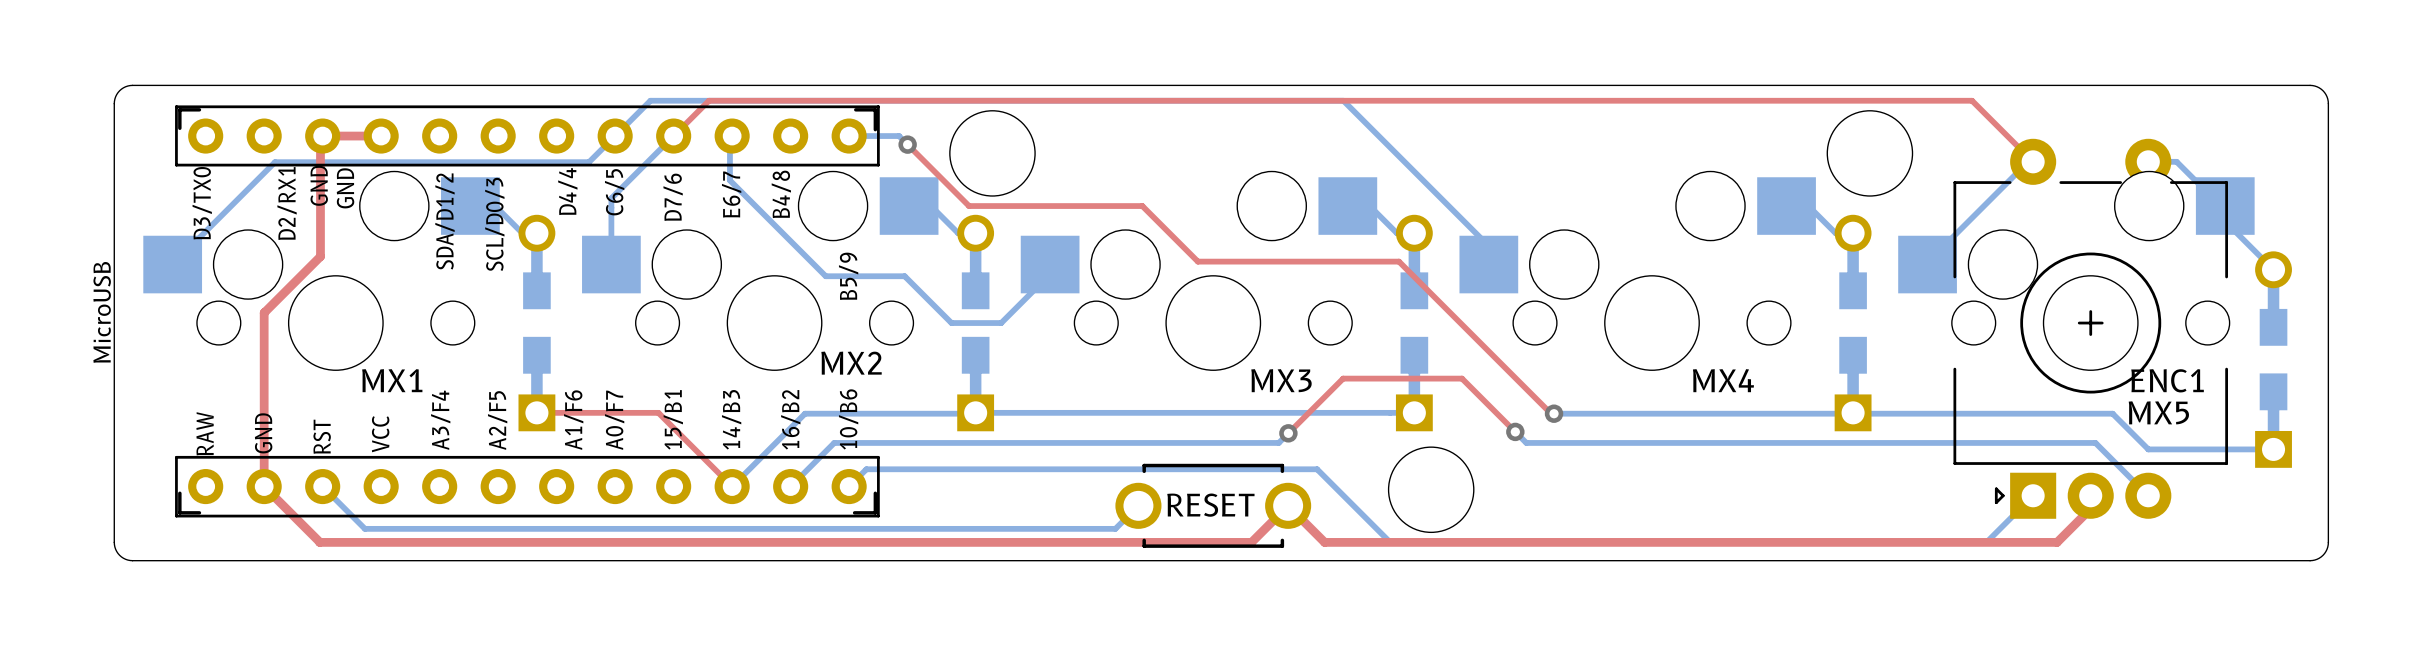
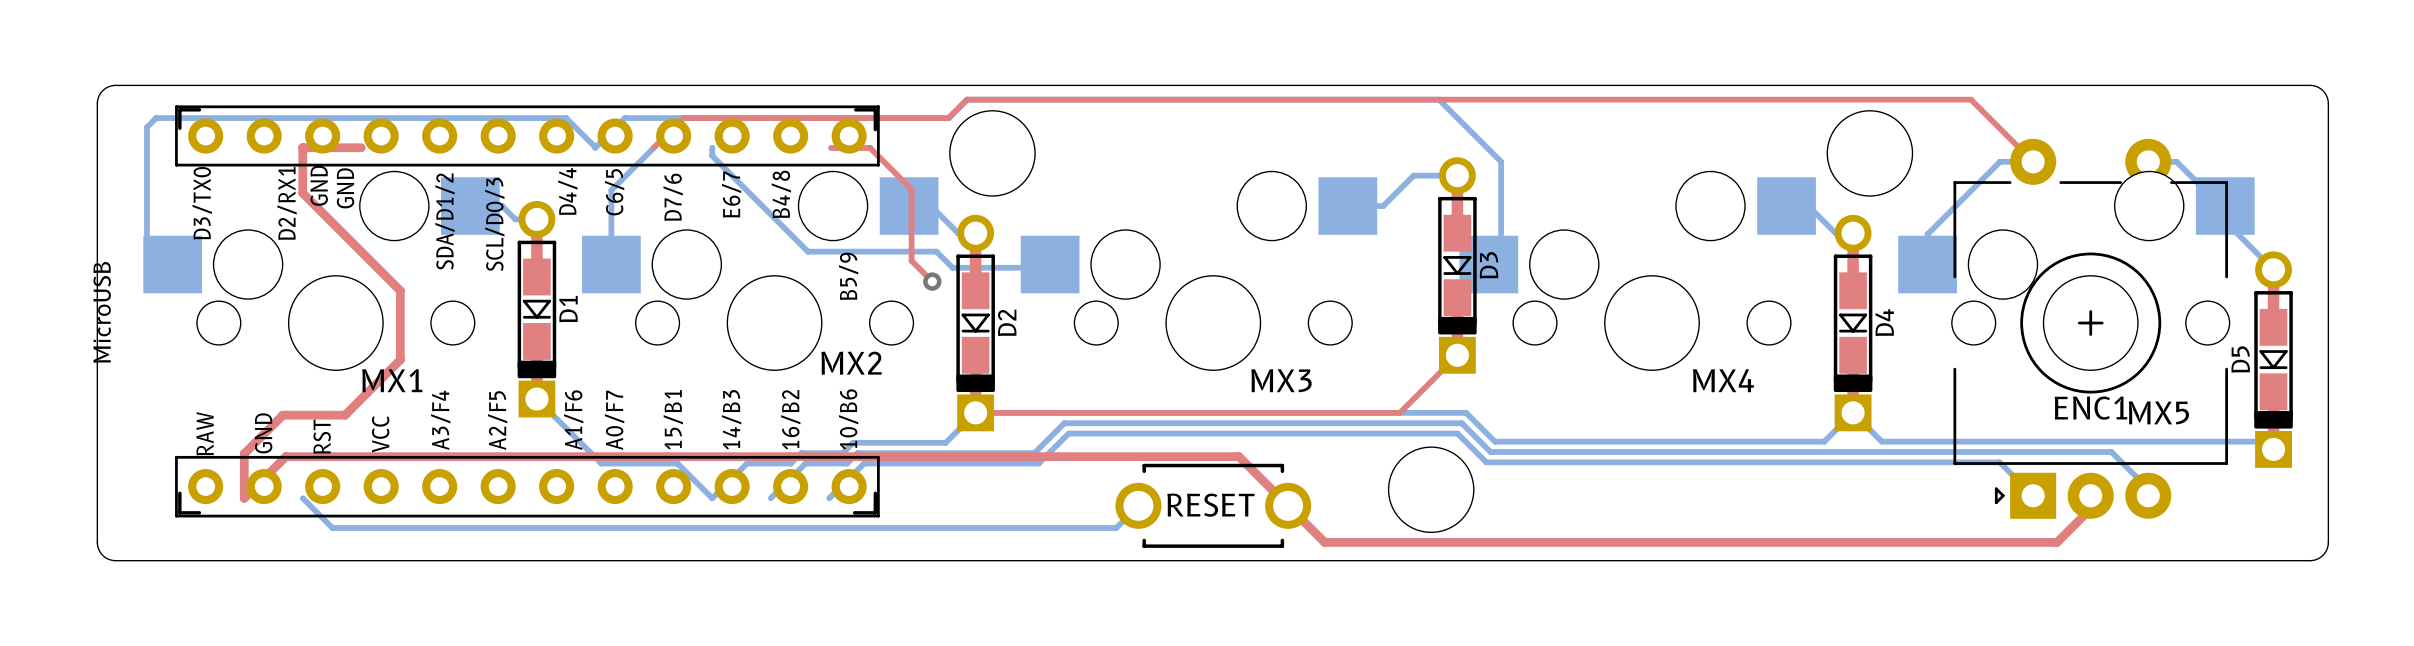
board edge: (132, 85) (119, 90) (114, 103) (114, 542) (119, 555) (132, 560) -> (132, 85) (113, 85) (106, 87) (99, 94) (97, 103) (97, 544) (101, 553) (108, 559) (132, 560)
top track: (1972, 100) (708, 100) (673, 136) -> (1972, 100) (966, 99) (948, 118) (683, 118) (653, 147)
top track: (381, 136) (322, 136) (320, 138) (320, 256) (264, 312) (264, 486) (319, 542) -> none
bottom track: (673, 136) (611, 198) -> (653, 147) (611, 190) (611, 198)
bottom track: (849, 136) (899, 136) (907, 144) -> none
top track: (907, 144) (969, 206) (1142, 206) (1197, 261) (1399, 261) (1551, 413) (1554, 413) -> none
via: (907, 144) -> none
top track: none -> (302, 147) (361, 147)
bottom track: (729, 147) (729, 180) (825, 276) (904, 276) (951, 323) (1001, 323) (1050, 274) (1050, 264) -> (712, 147) (712, 155) (807, 251) (936, 251) (952, 267) (1046, 267) (1050, 264)
top track: none -> (830, 148) (870, 148) (911, 189) (911, 260) (932, 281)
bottom track: (2028, 161) (1927, 262) -> (2028, 161) (2000, 161) (1927, 234) (1927, 262)
bottom track: (495, 206) (522, 233) (536, 233) -> (495, 206) (502, 206) (515, 219) (536, 219)
bottom track: (1369, 206) (1396, 233) (1414, 233) -> (1369, 206) (1383, 206) (1413, 175) (1457, 175)
bottom track: (172, 264) (275, 162) (589, 162) (650, 100) (1343, 100) (1488, 246) (1488, 264) -> (172, 264) (146, 238) (146, 127) (156, 118) (566, 118) (595, 147) (624, 118) (948, 118) (967, 99) (1438, 99) (1501, 161) (1501, 252) (1488, 264)
D3: none -> (1457, 265)
via: none -> (932, 281)
D1: none -> (536, 309)
part: (536, 323) -> none
part: (975, 323) -> none
D2: none -> (975, 323)
part: (1414, 323) -> none
part: (1853, 323) -> none
D4: none -> (1853, 323)
top track: none -> (1457, 355) (1399, 412) (975, 412)
part: (2273, 359) -> none
D5: none -> (2273, 359)
ENC1 name position: ENC1 (2167, 380) -> ENC1 (2090, 408)
top track: (536, 412) (658, 412) (732, 486) -> none
bottom track: (974, 413) (805, 413) (732, 486) -> (974, 413) (945, 442) (853, 442) (842, 453) (801, 453) (790, 463) (747, 463) (712, 498) (677, 463) (601, 463) (536, 399)
bottom track: (1554, 413) (1852, 413) -> (1414, 412) (1466, 412) (1494, 441) (1824, 441) (1852, 413)
via: (1554, 413) -> none
bottom track: (1853, 413) (2112, 413) (2148, 449) (2273, 449) -> (1853, 413) (1881, 441) (2265, 441) (2273, 449)
bottom track: (1515, 431) (1526, 442) (2095, 442) (2148, 495) -> (770, 498) (805, 463) (847, 463) (857, 453) (1034, 453) (1064, 423) (1461, 423) (1490, 452) (2111, 452) (2148, 488) (2148, 495)
top track: (1515, 431) (1462, 378) (1343, 378) (1288, 433) -> none
via: (1515, 431) -> none
bottom track: (1288, 433) (1278, 442) (834, 442) (790, 486) -> none
via: (1288, 433) -> none
bottom track: (322, 486) (364, 528) (1116, 528) -> (302, 498) (332, 528) (1116, 528)
bottom track: (849, 486) (866, 469) (1317, 469) (1390, 542) (1986, 542) (2033, 495) -> (829, 498) (863, 463) (1038, 463) (1068, 433) (1457, 433) (1486, 462) (1999, 462) (2033, 495)
top track: (1288, 505) (1251, 542) (319, 542) -> (1288, 505) (1238, 456) (285, 456) (244, 498) (244, 453) (282, 415) (345, 415) (400, 359) (400, 290) (302, 193) (302, 147)

